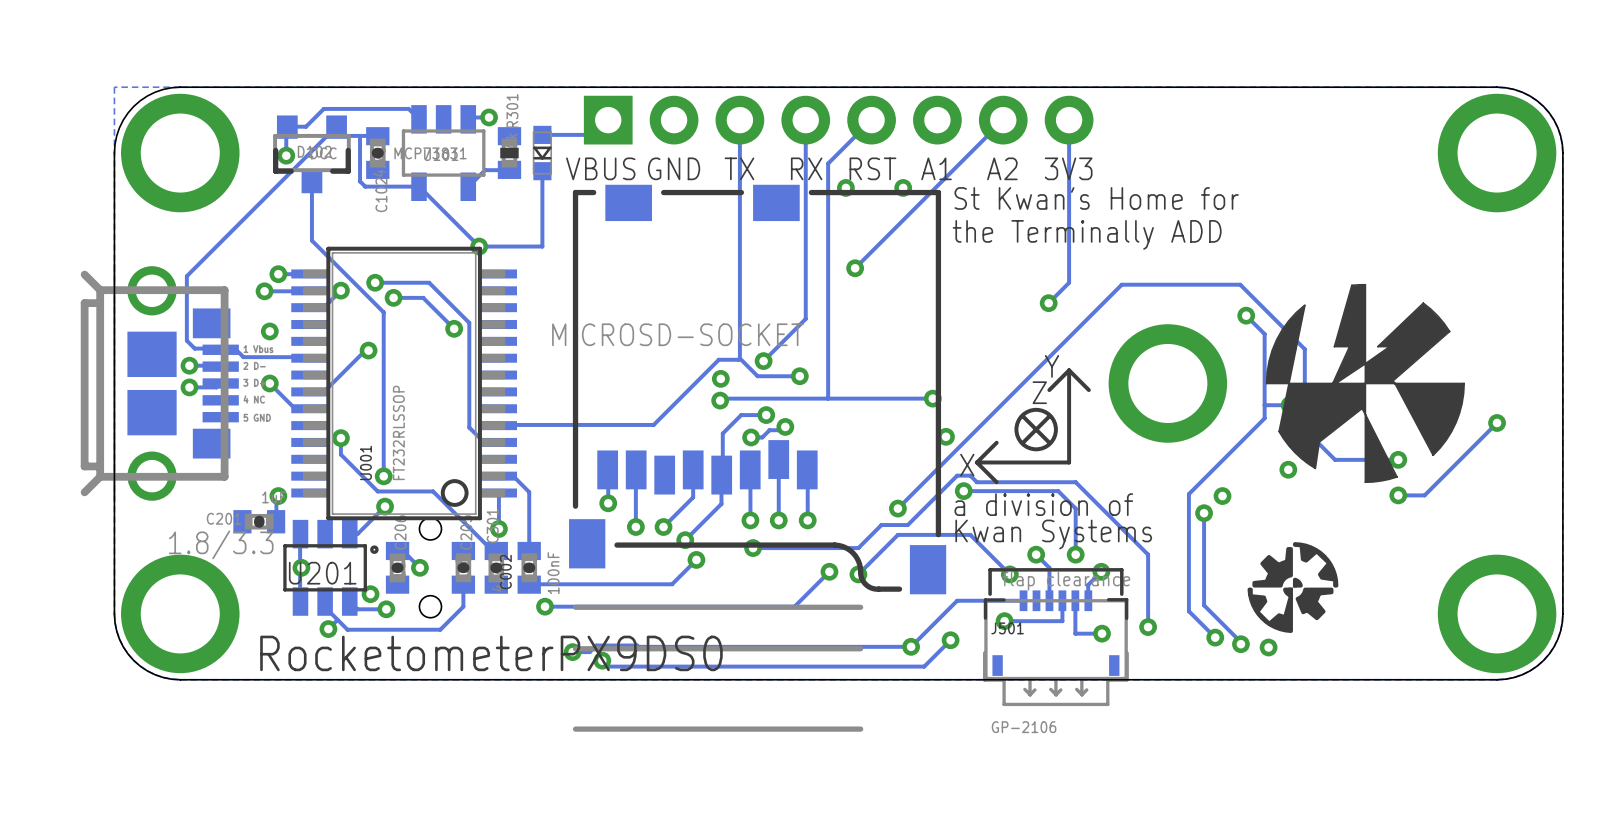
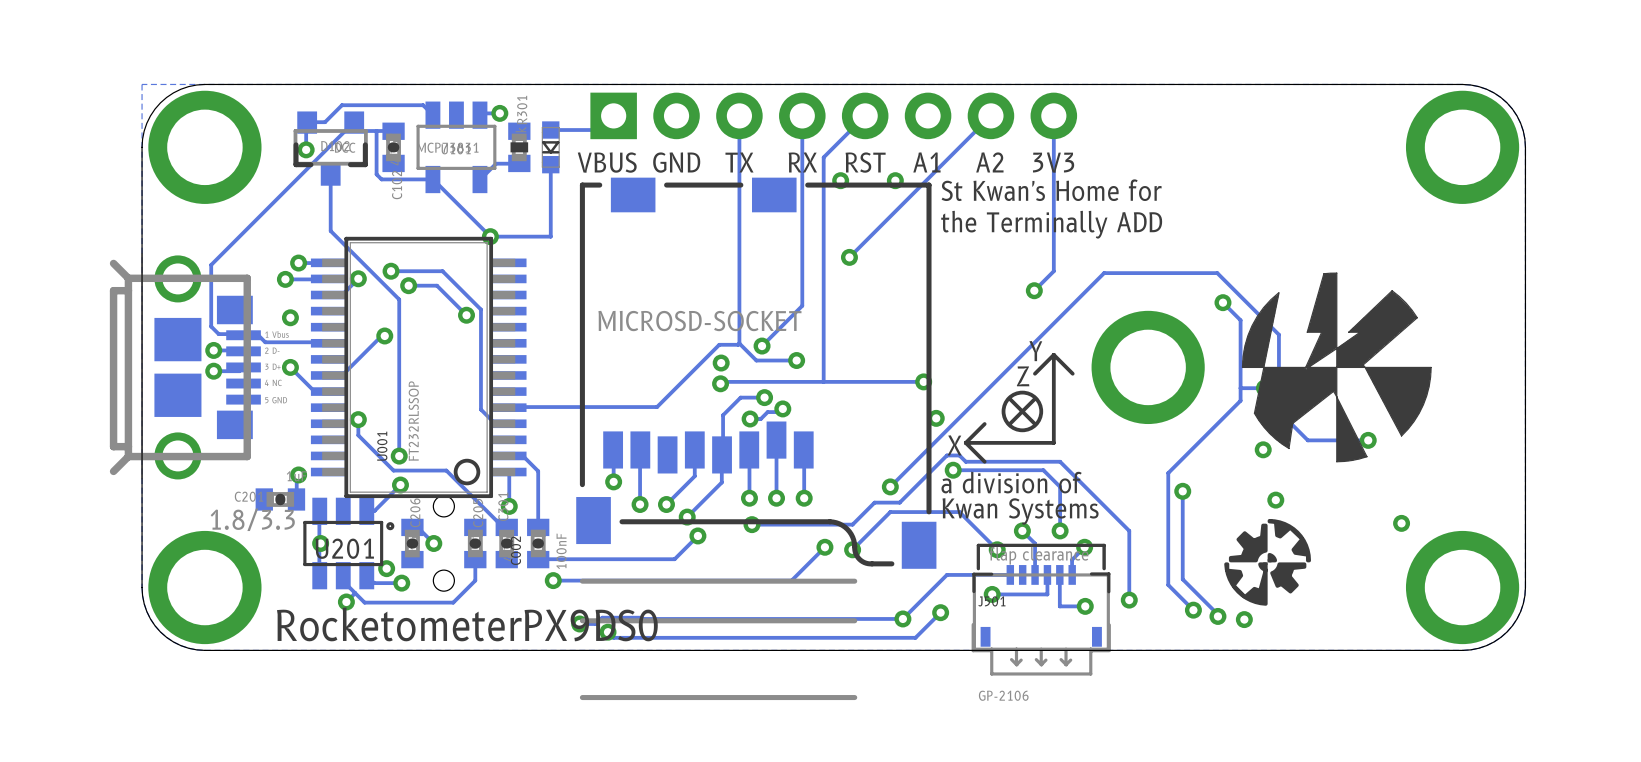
track: (1497, 422) (1424, 495) (1398, 495) -> none
via: (1497, 422) -> none
via: (1398, 495) -> none
via: (1222, 496) -> none
via: none -> (1275, 500)
via: none -> (1401, 523)

